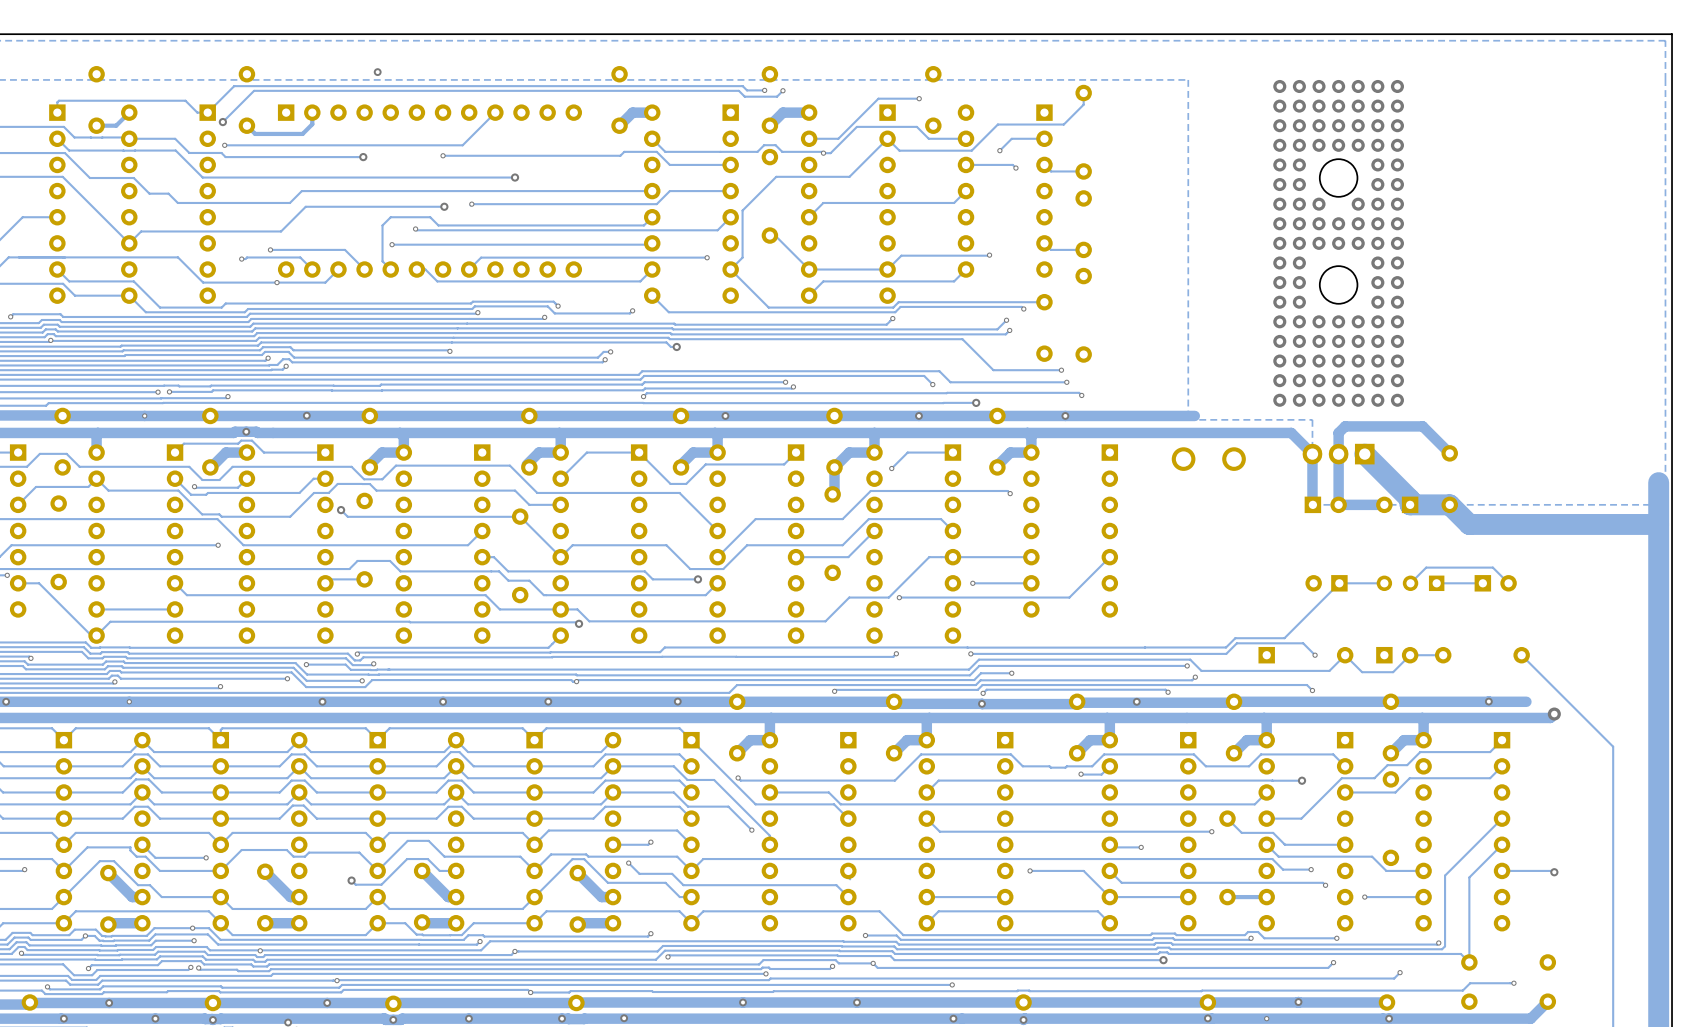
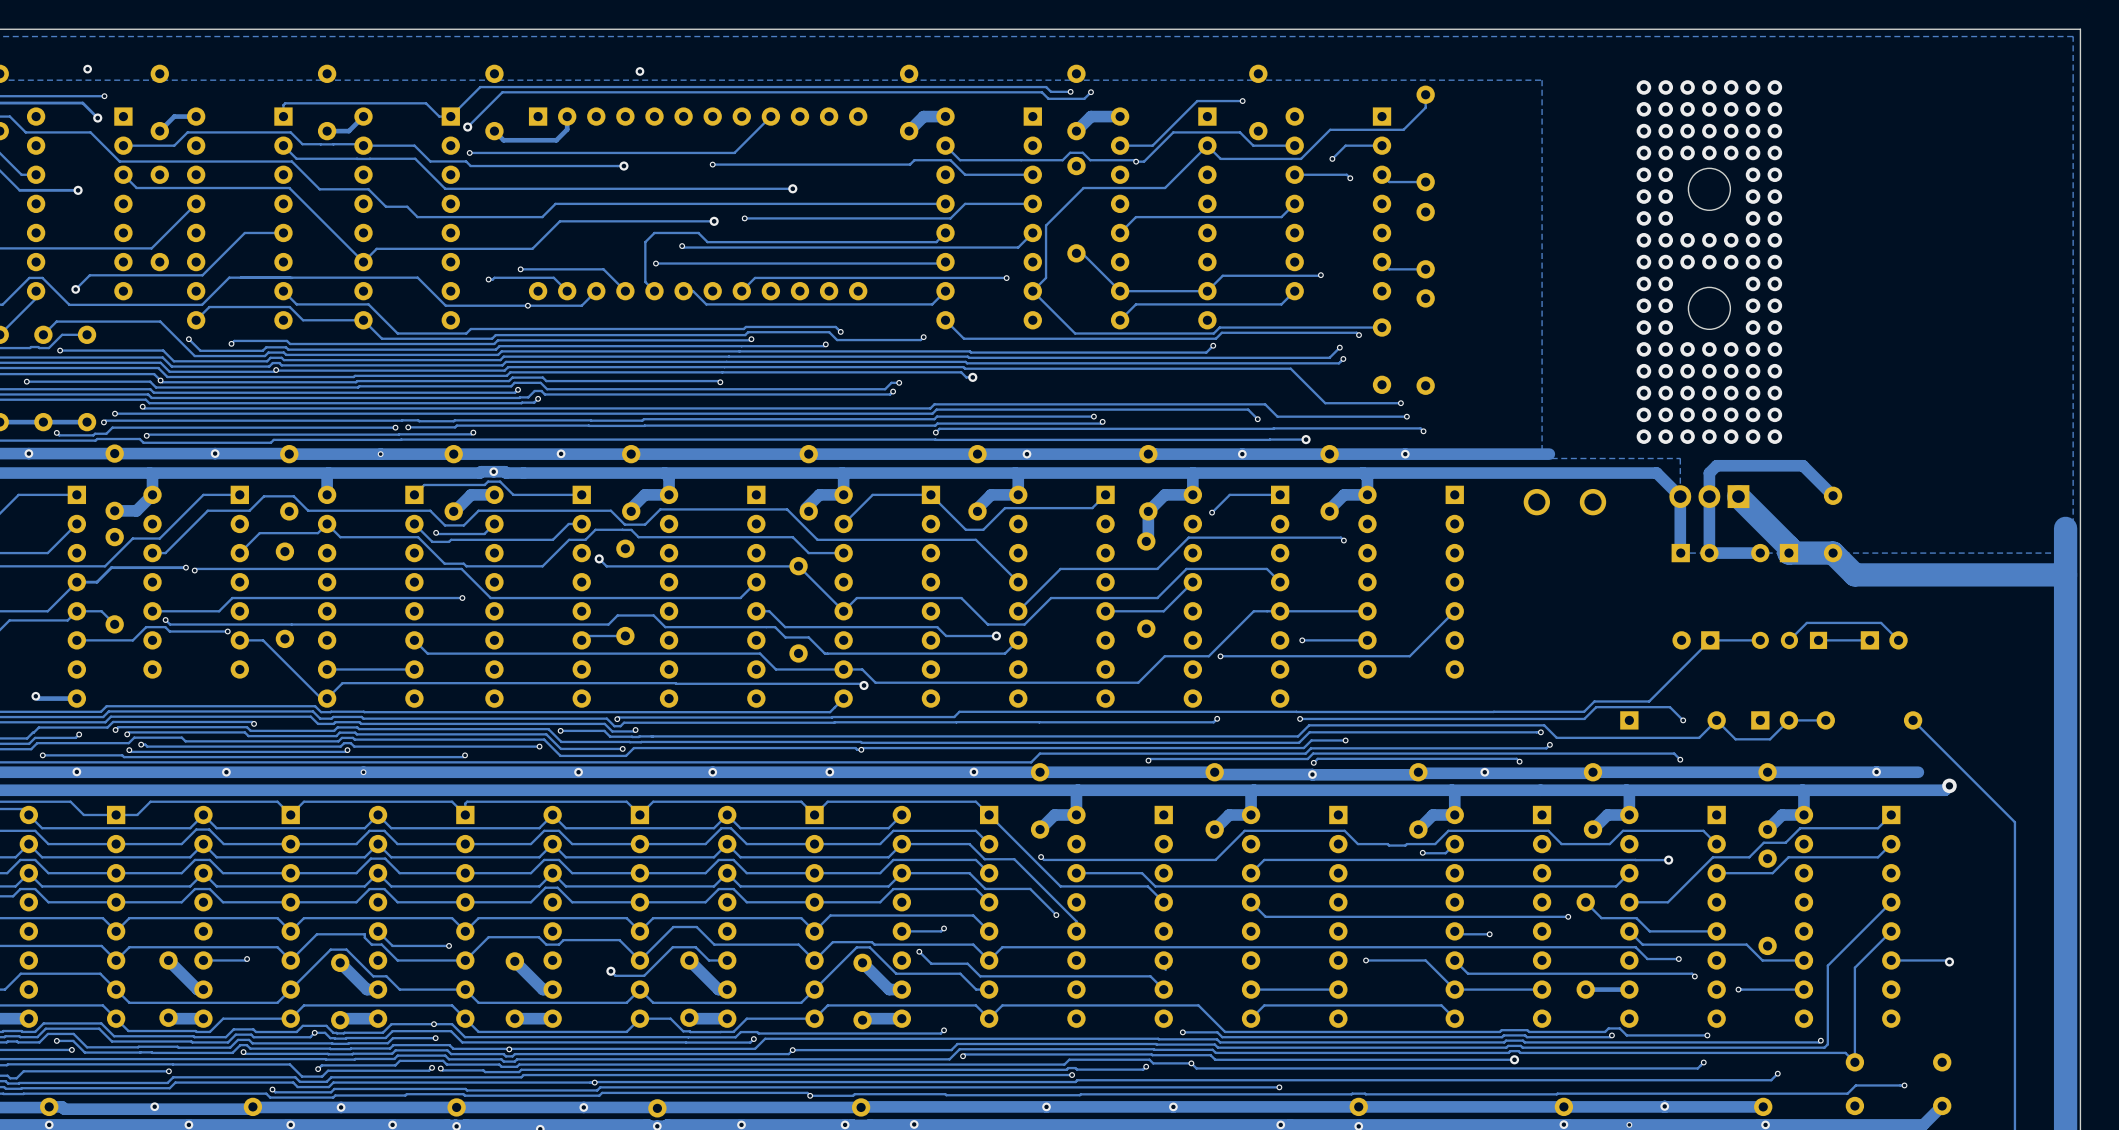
via: (1319, 204) -> none
via: (1358, 204) -> none

